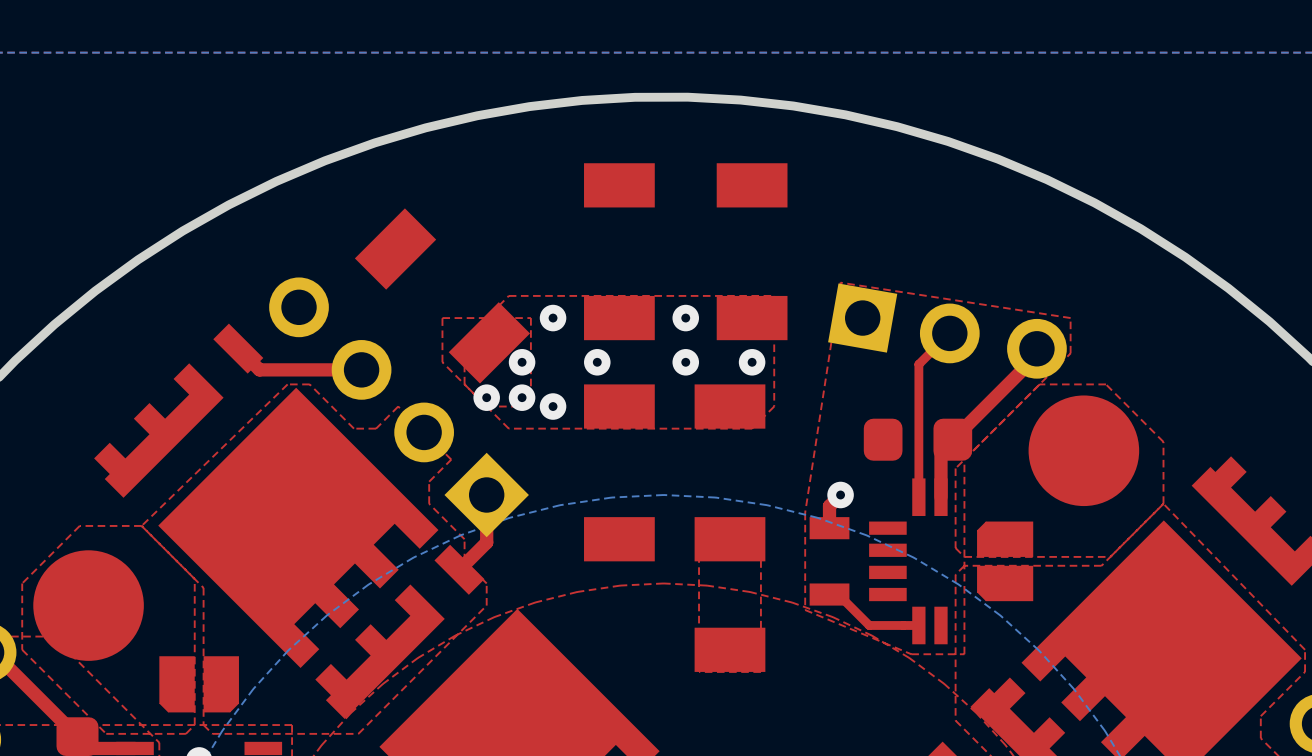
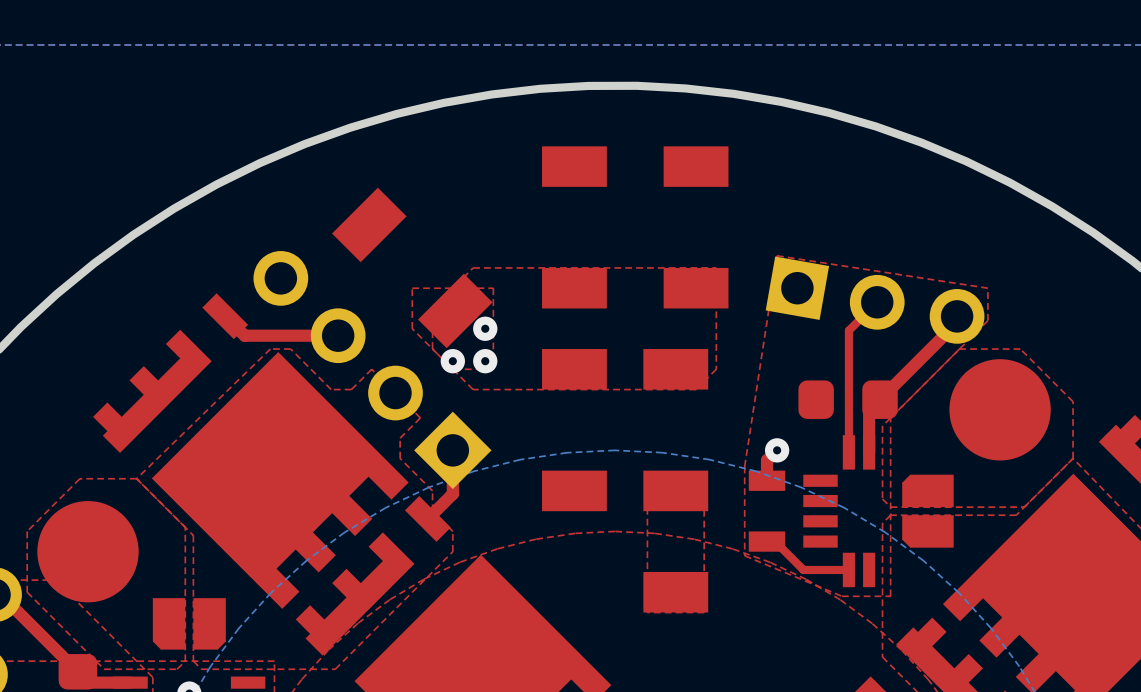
via: (553, 318) -> none
via: (685, 318) -> none
via: (597, 362) -> none
via: (685, 362) -> none
via: (752, 362) -> none
via: (553, 406) -> none

